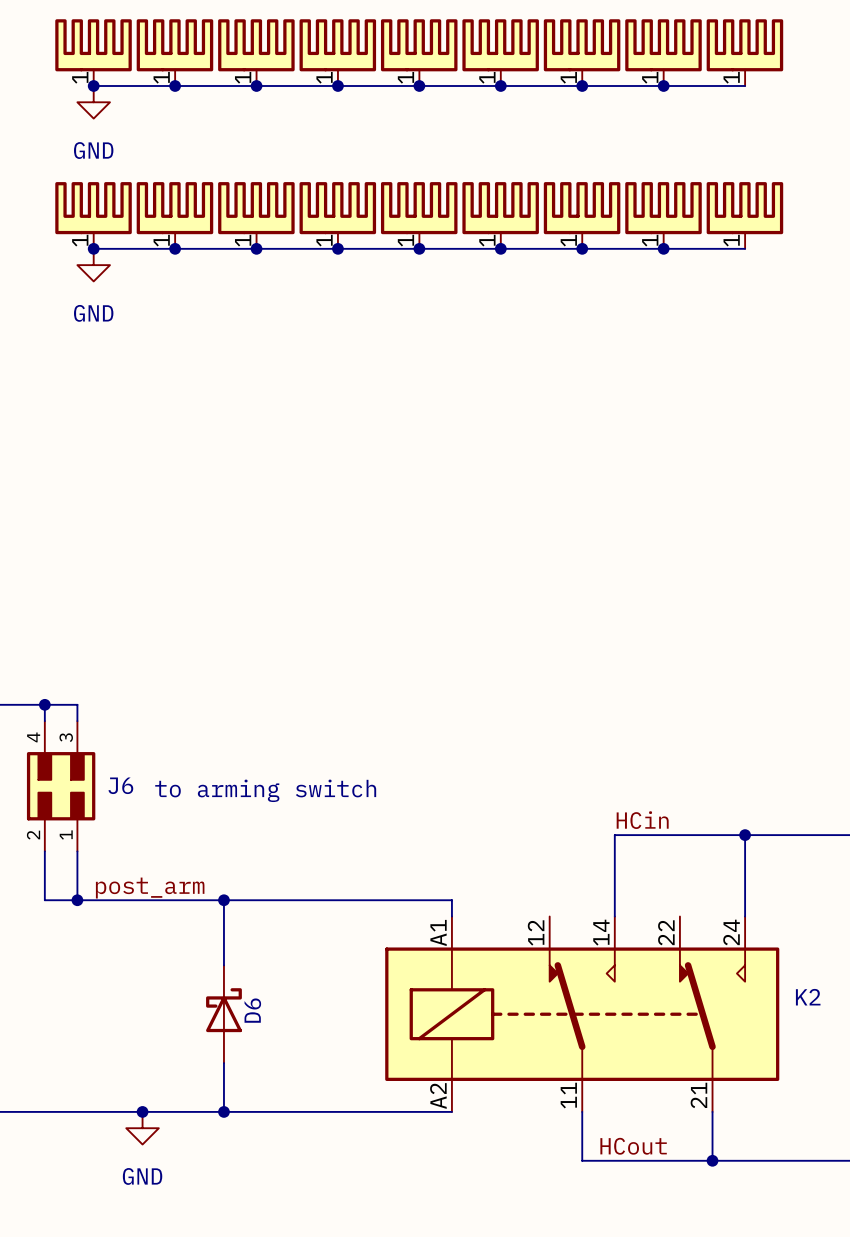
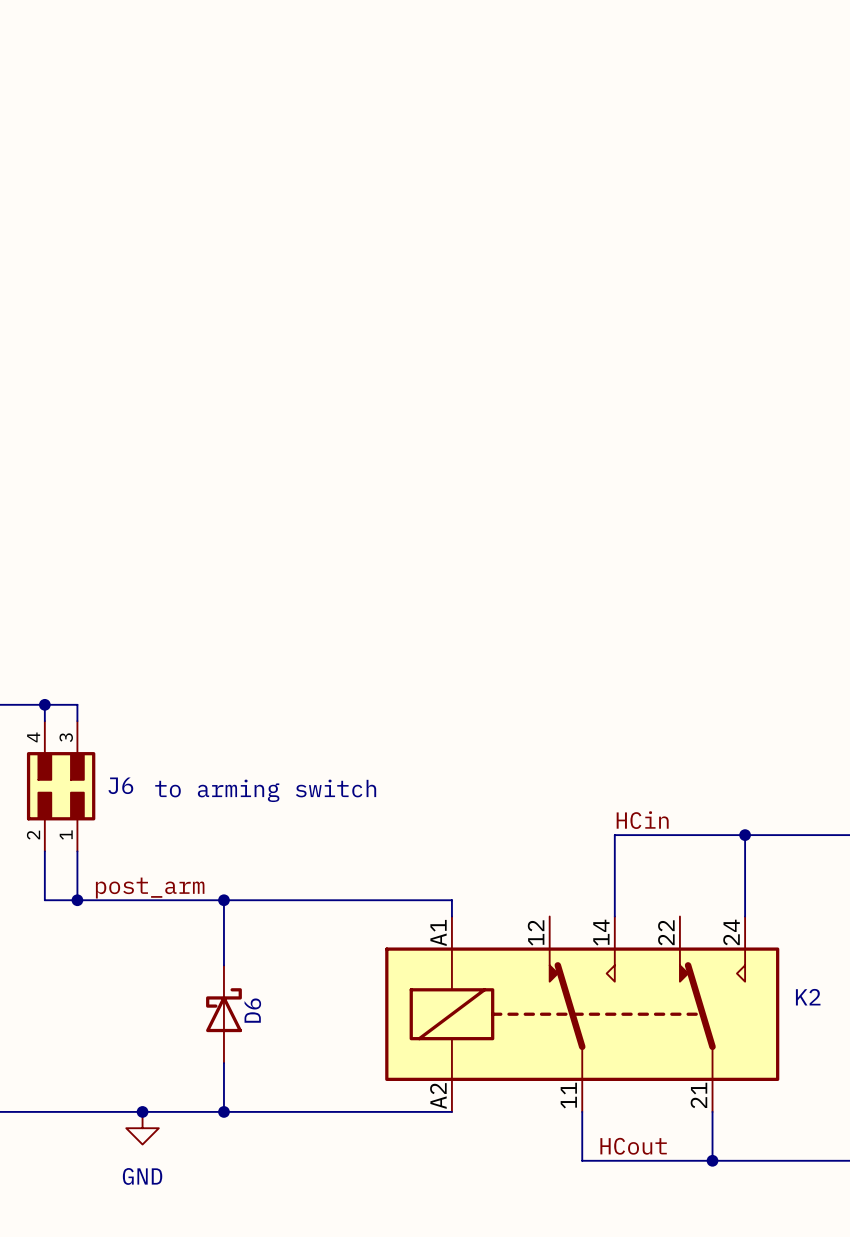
part: (93, 52) -> none
part: (174, 52) -> none
part: (256, 52) -> none
part: (337, 52) -> none
part: (419, 52) -> none
part: (500, 52) -> none
part: (582, 52) -> none
part: (663, 52) -> none
part: (744, 52) -> none
wire: (93, 86) (745, 86) -> none
junction: (93, 86) -> none
junction: (175, 86) -> none
junction: (256, 86) -> none
junction: (337, 86) -> none
junction: (419, 86) -> none
junction: (500, 86) -> none
junction: (582, 86) -> none
junction: (663, 86) -> none
power symbol: GND (93, 102) -> none
part: (93, 215) -> none
part: (174, 215) -> none
part: (256, 215) -> none
part: (337, 215) -> none
part: (419, 215) -> none
part: (500, 215) -> none
part: (582, 215) -> none
part: (663, 215) -> none
part: (744, 215) -> none
wire: (93, 248) (745, 248) -> none
junction: (93, 248) -> none
junction: (175, 248) -> none
junction: (256, 248) -> none
junction: (337, 248) -> none
junction: (419, 248) -> none
junction: (500, 248) -> none
junction: (582, 248) -> none
junction: (663, 248) -> none
power symbol: GND (93, 265) -> none

